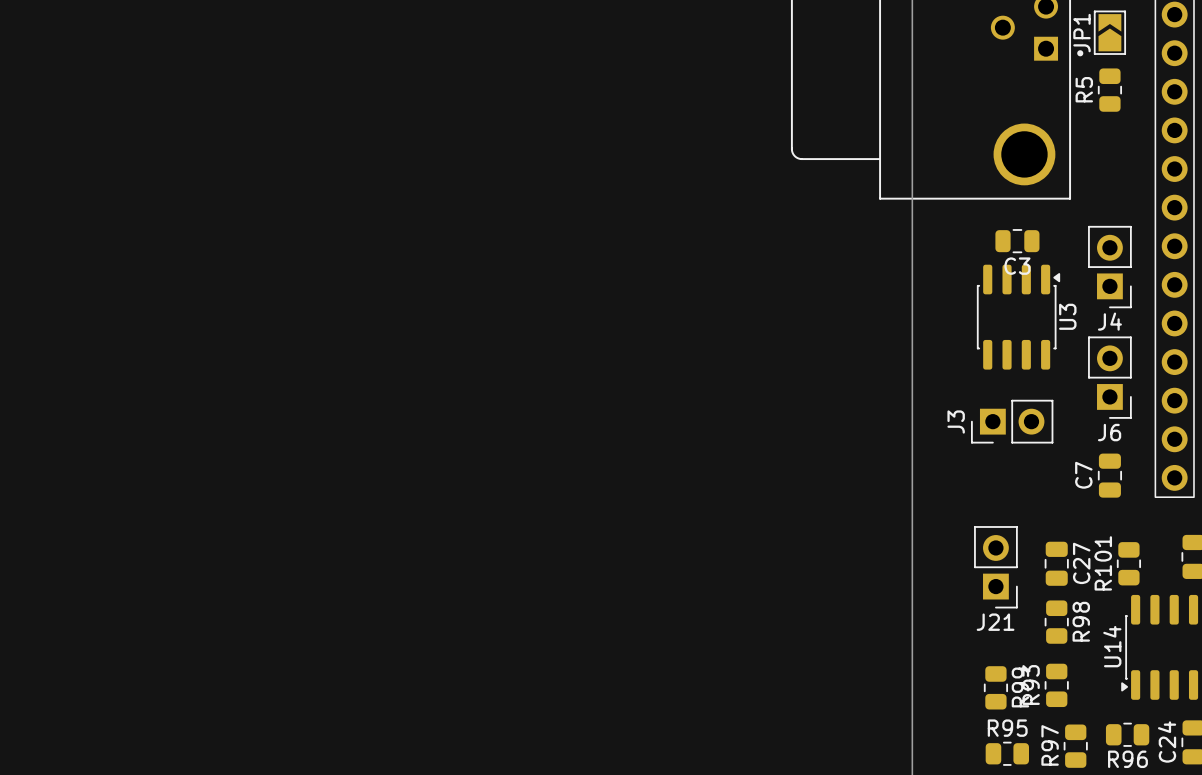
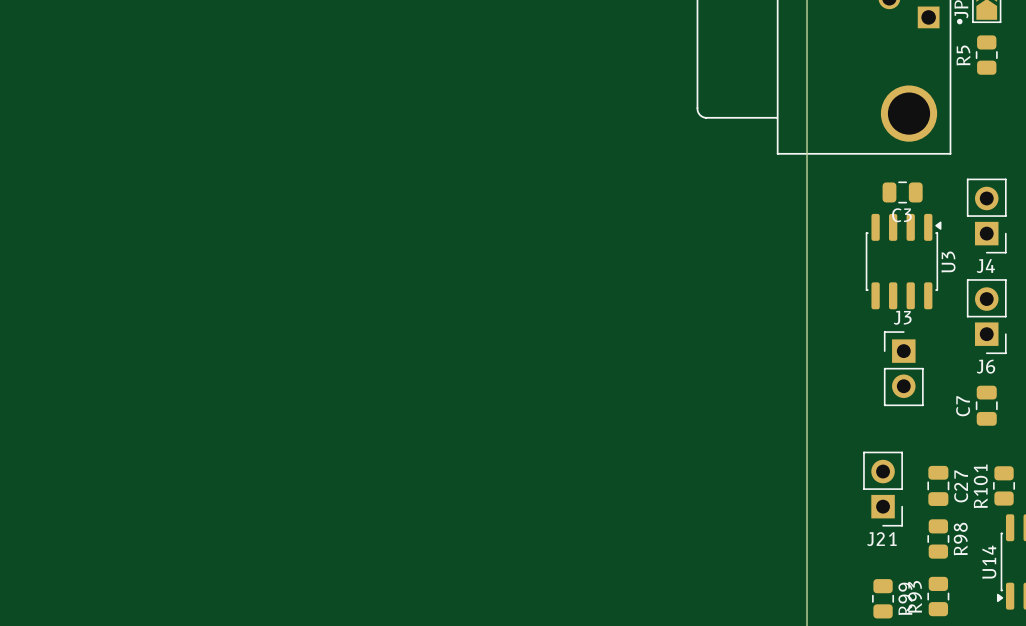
J3 rotation: 0° (1012, 421) -> 90° clockwise (903, 368)

